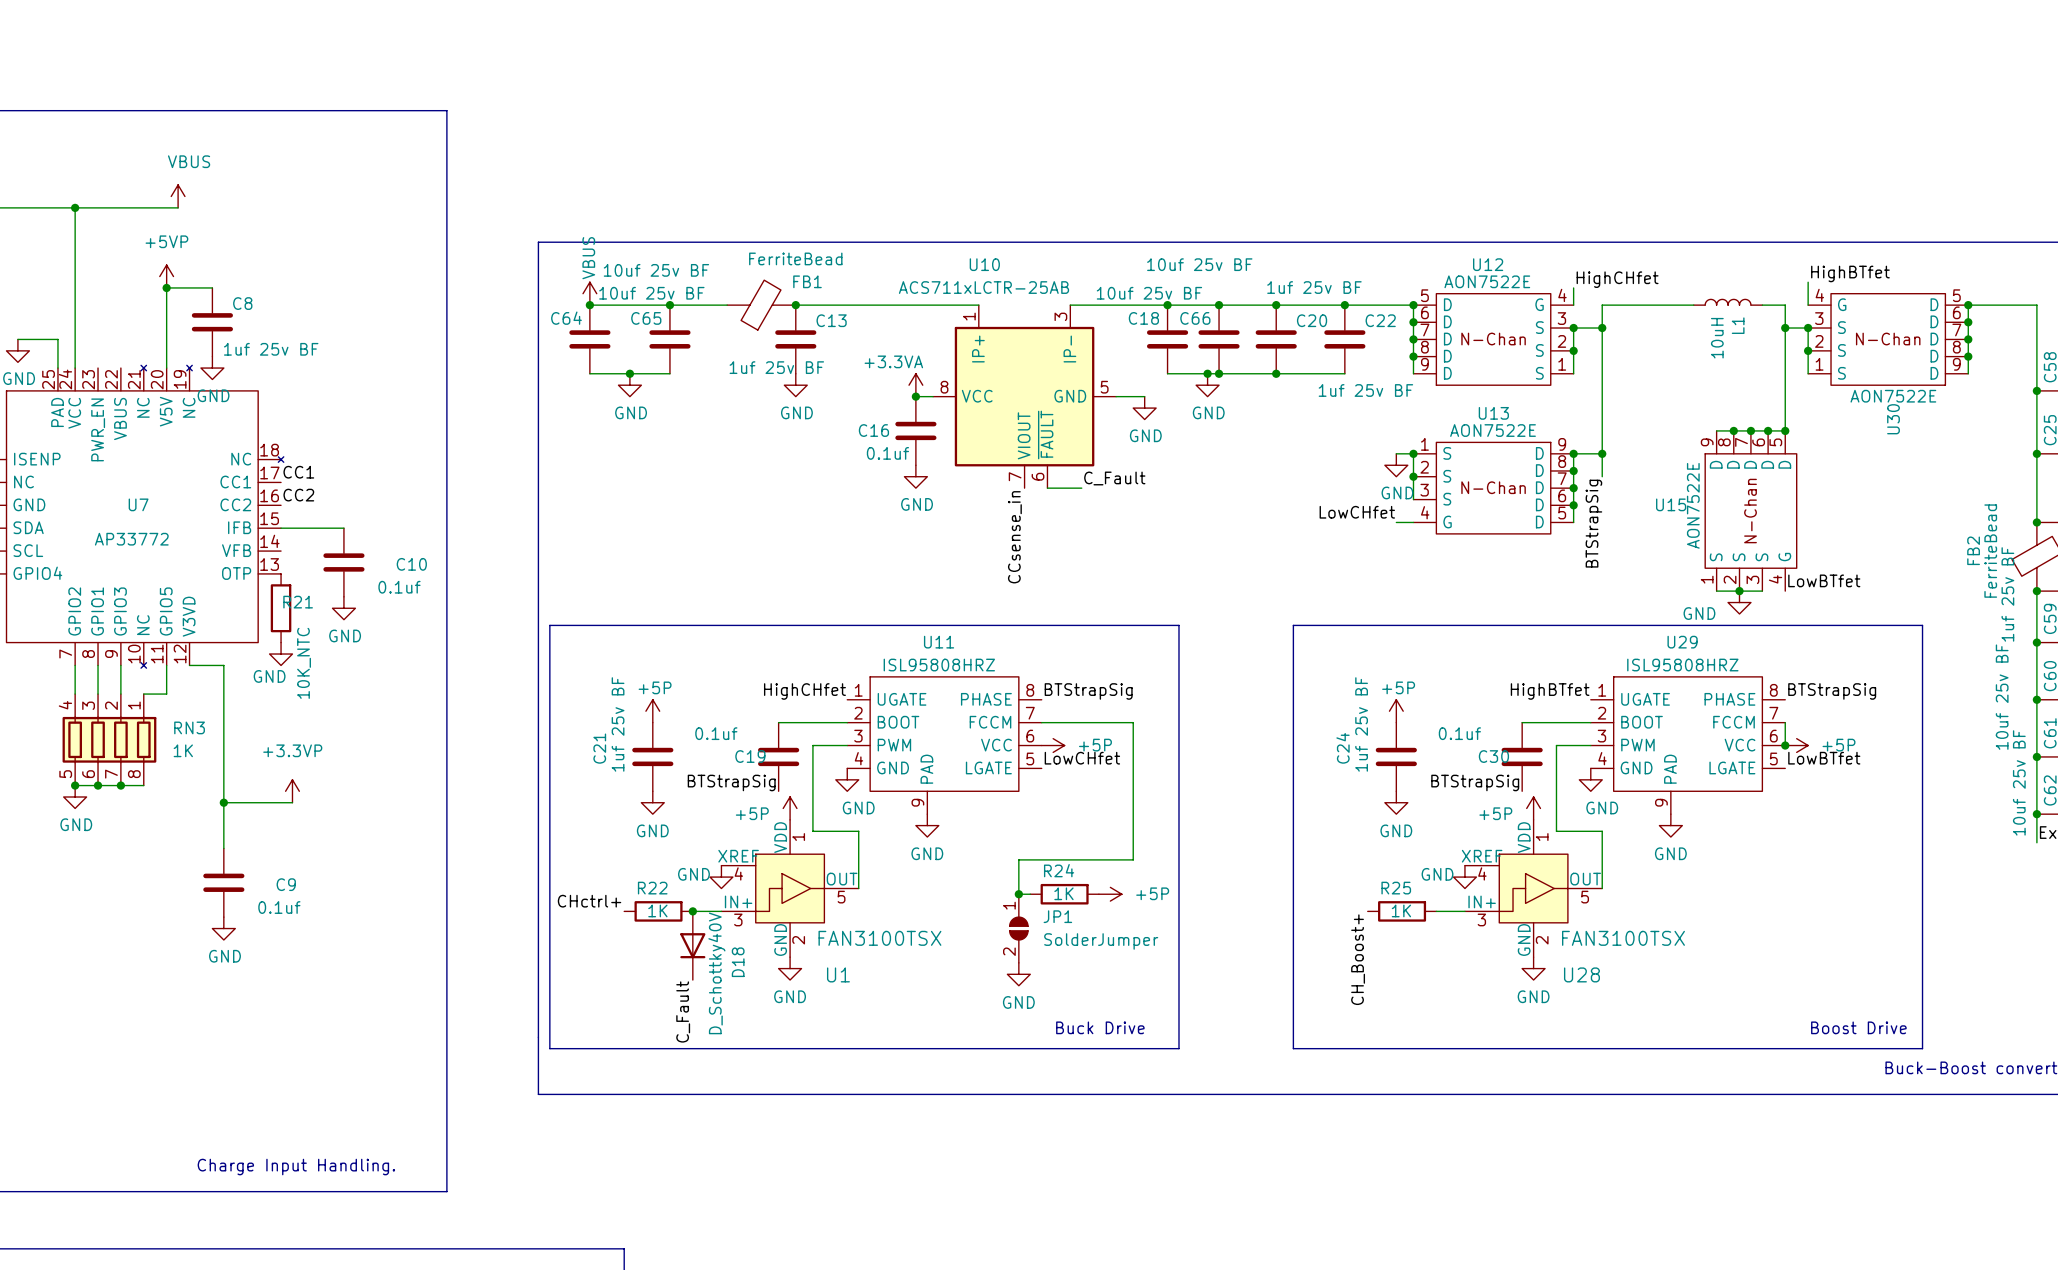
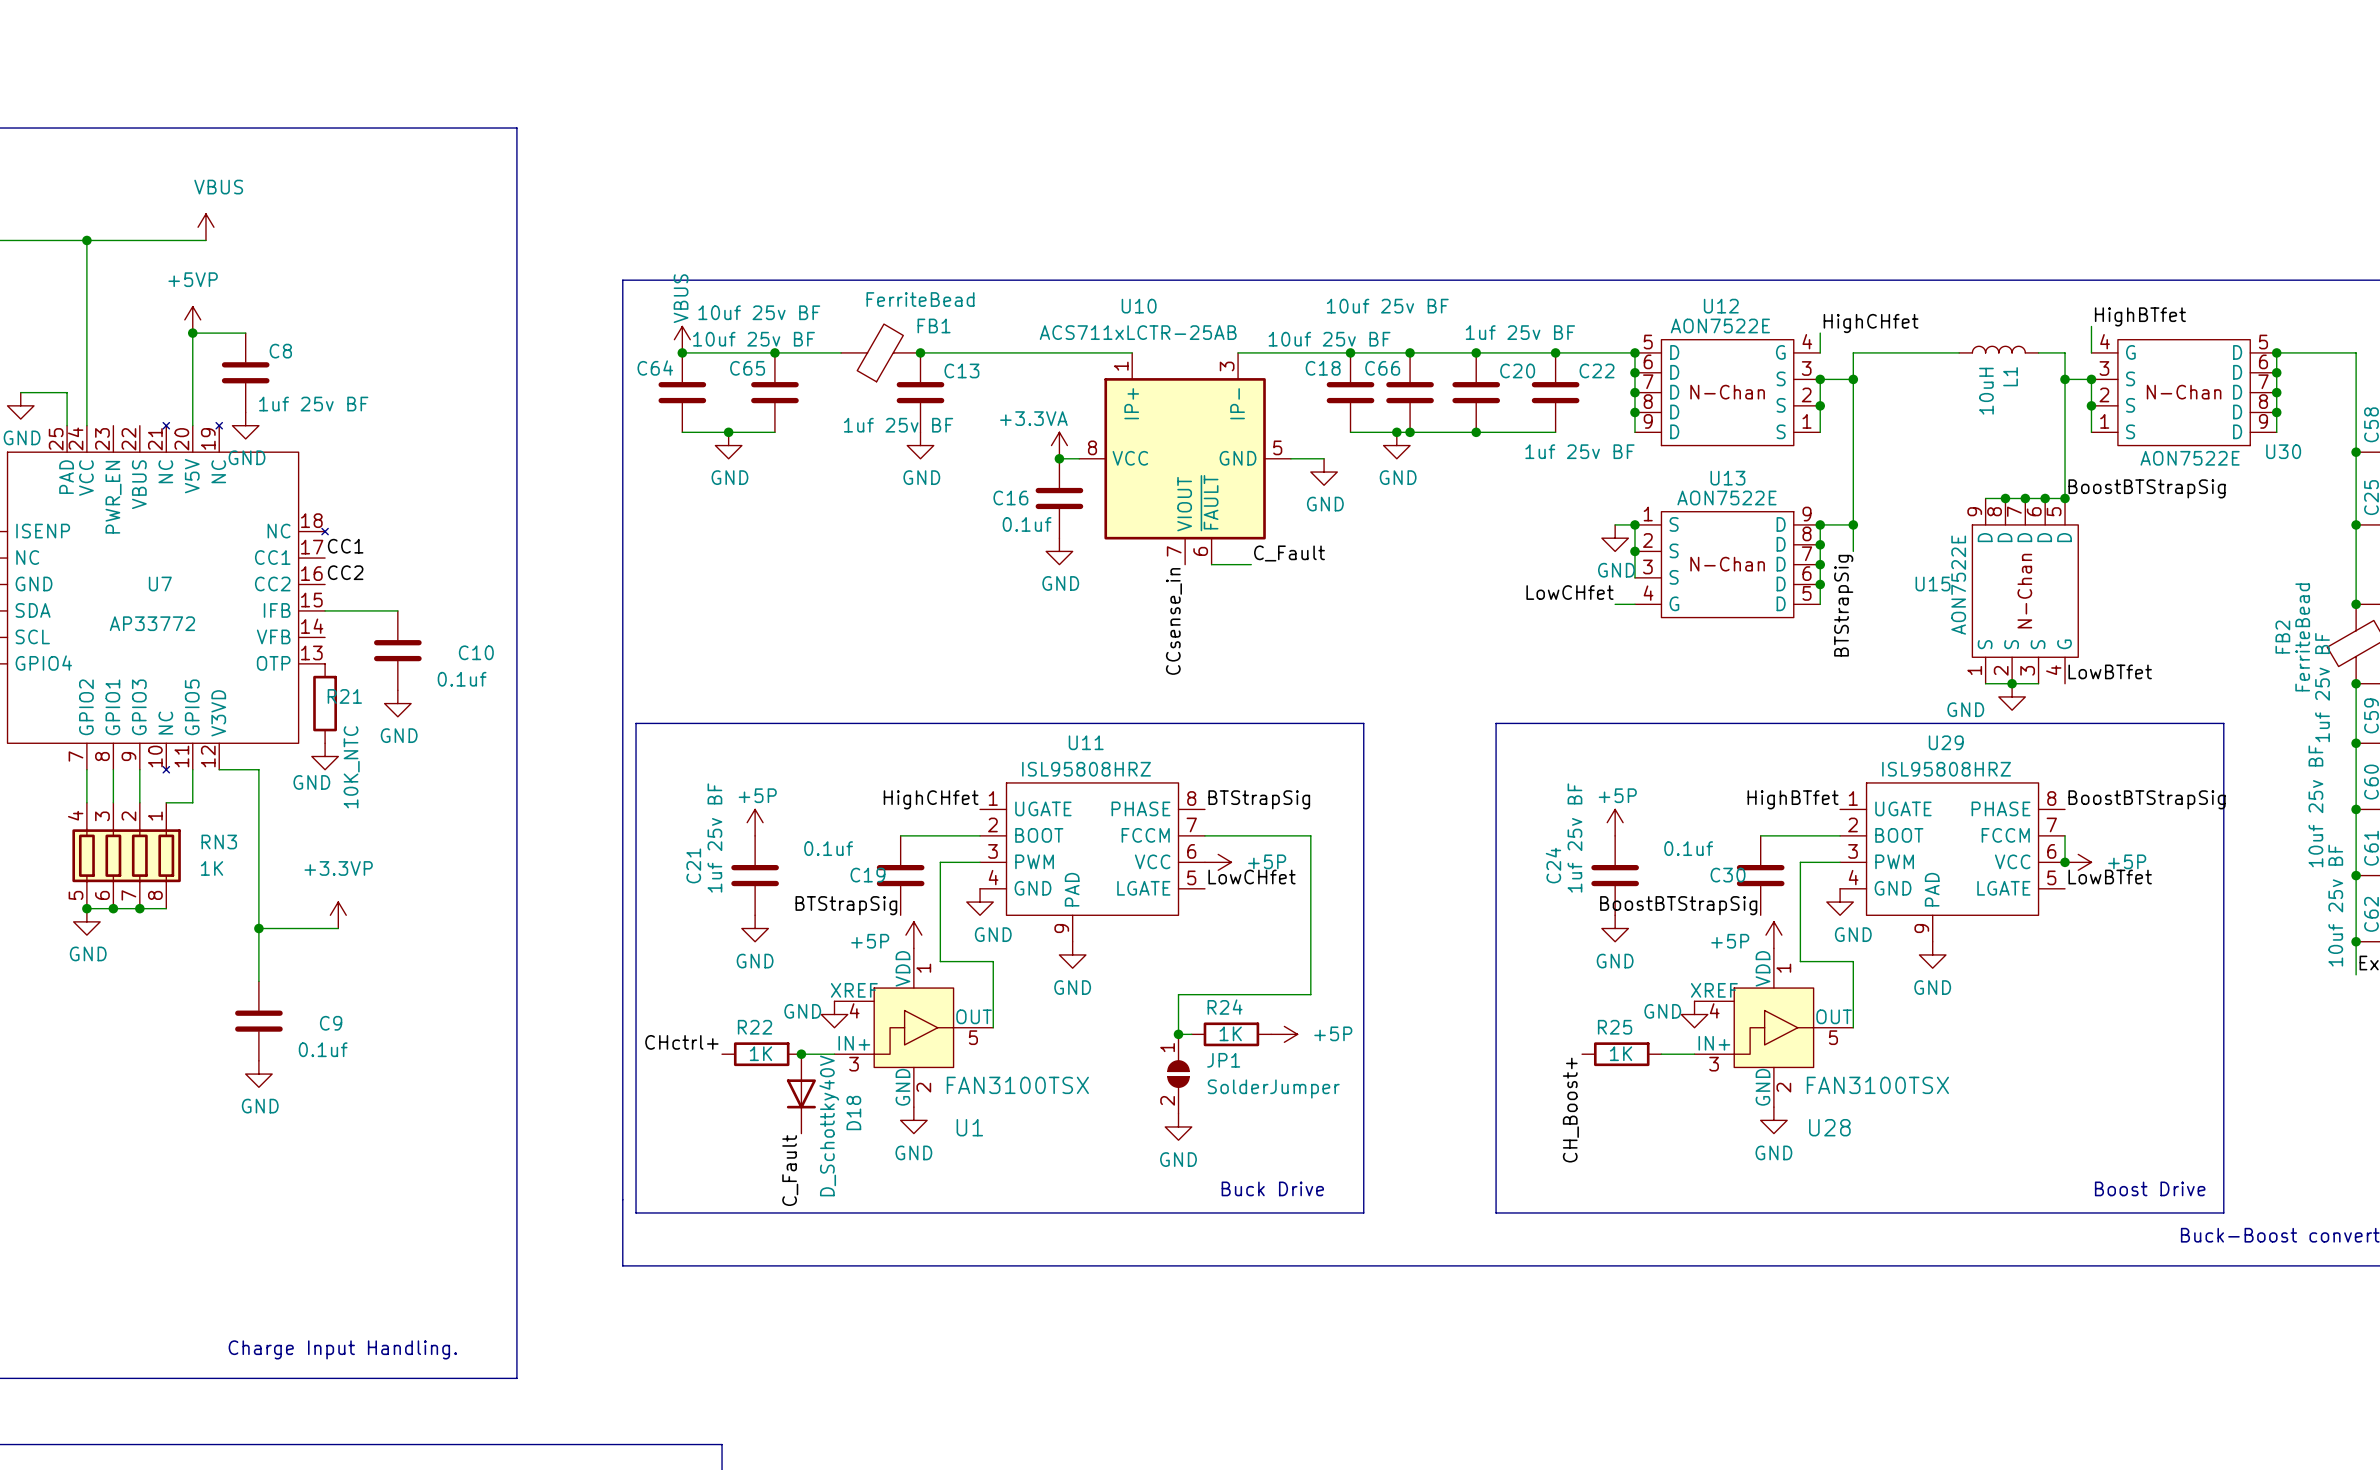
U30 name rotation: 0° (1893, 419) -> 90° clockwise (2283, 451)
U30 name position: U30 (1893, 419) -> U30 (2283, 451)
label: none -> BoostBTStrapSig (2147, 488)
label: BTStrapSig (1832, 691) -> BoostBTStrapSig (2147, 799)
label: BTStrapSig (1475, 782) -> BoostBTStrapSig (1678, 905)

